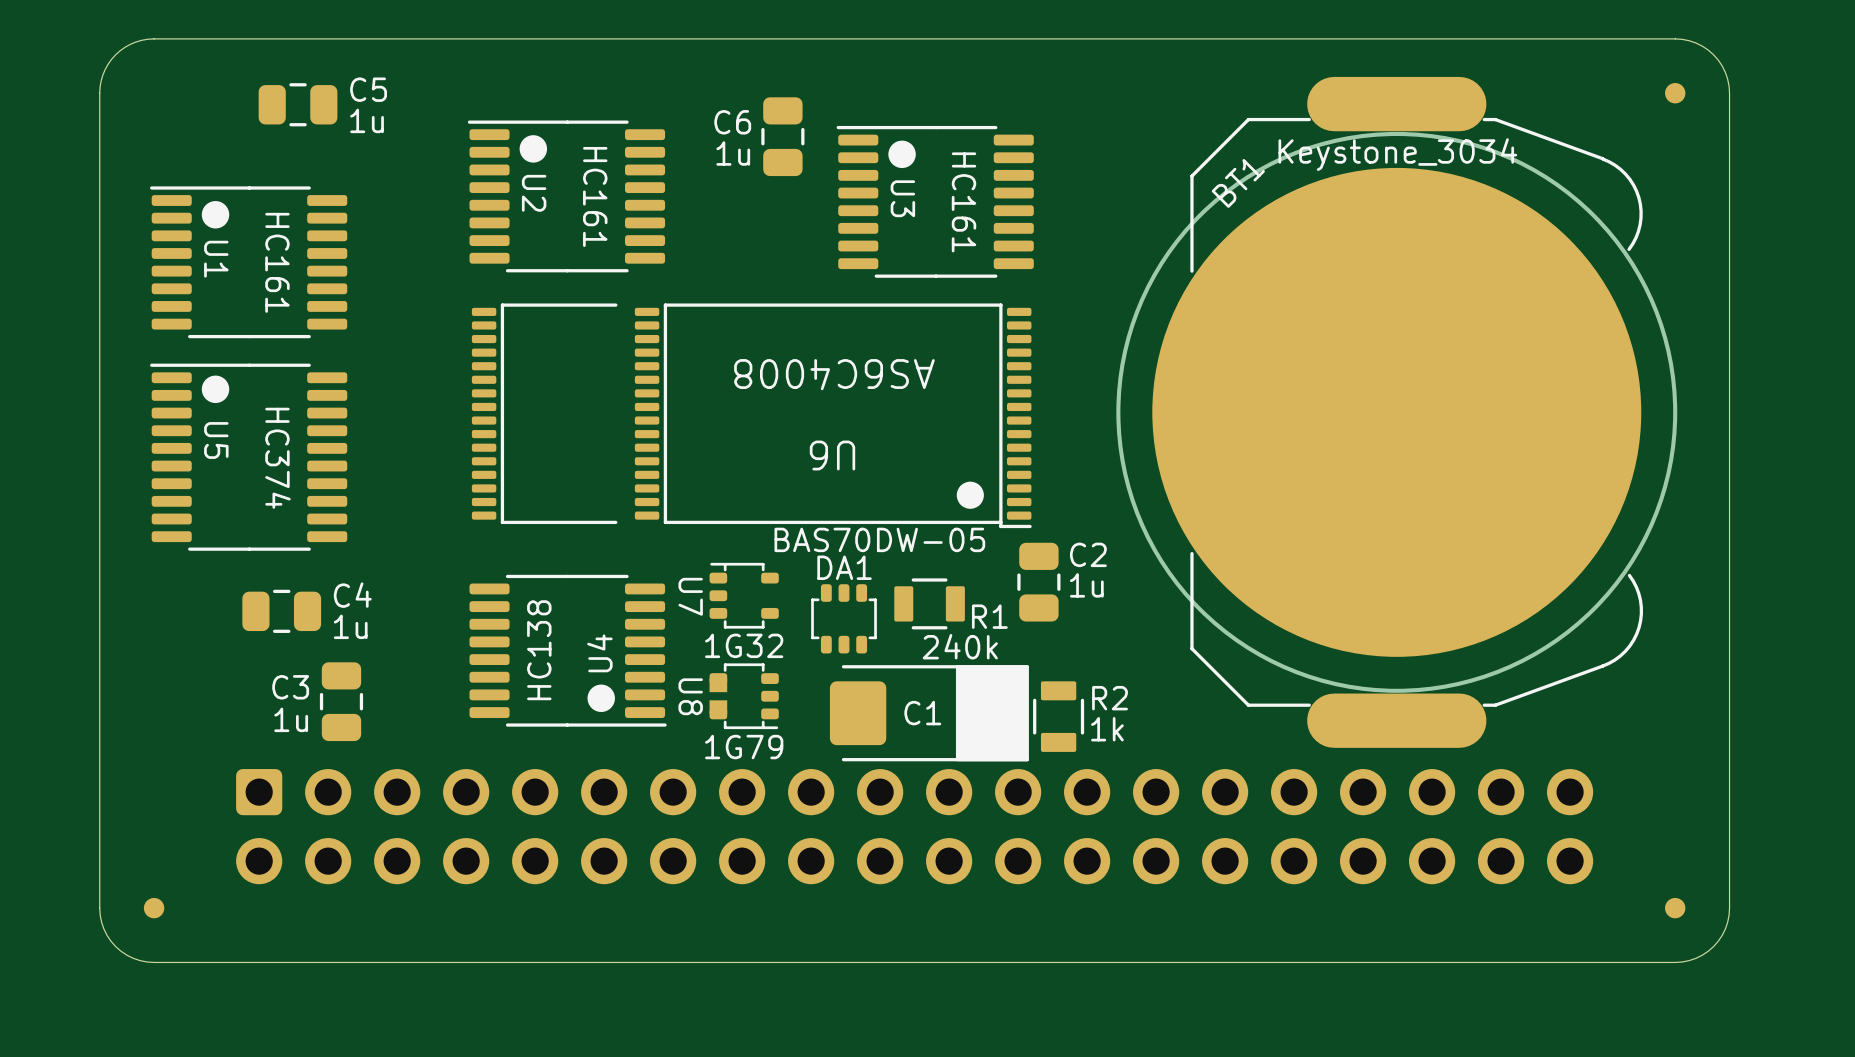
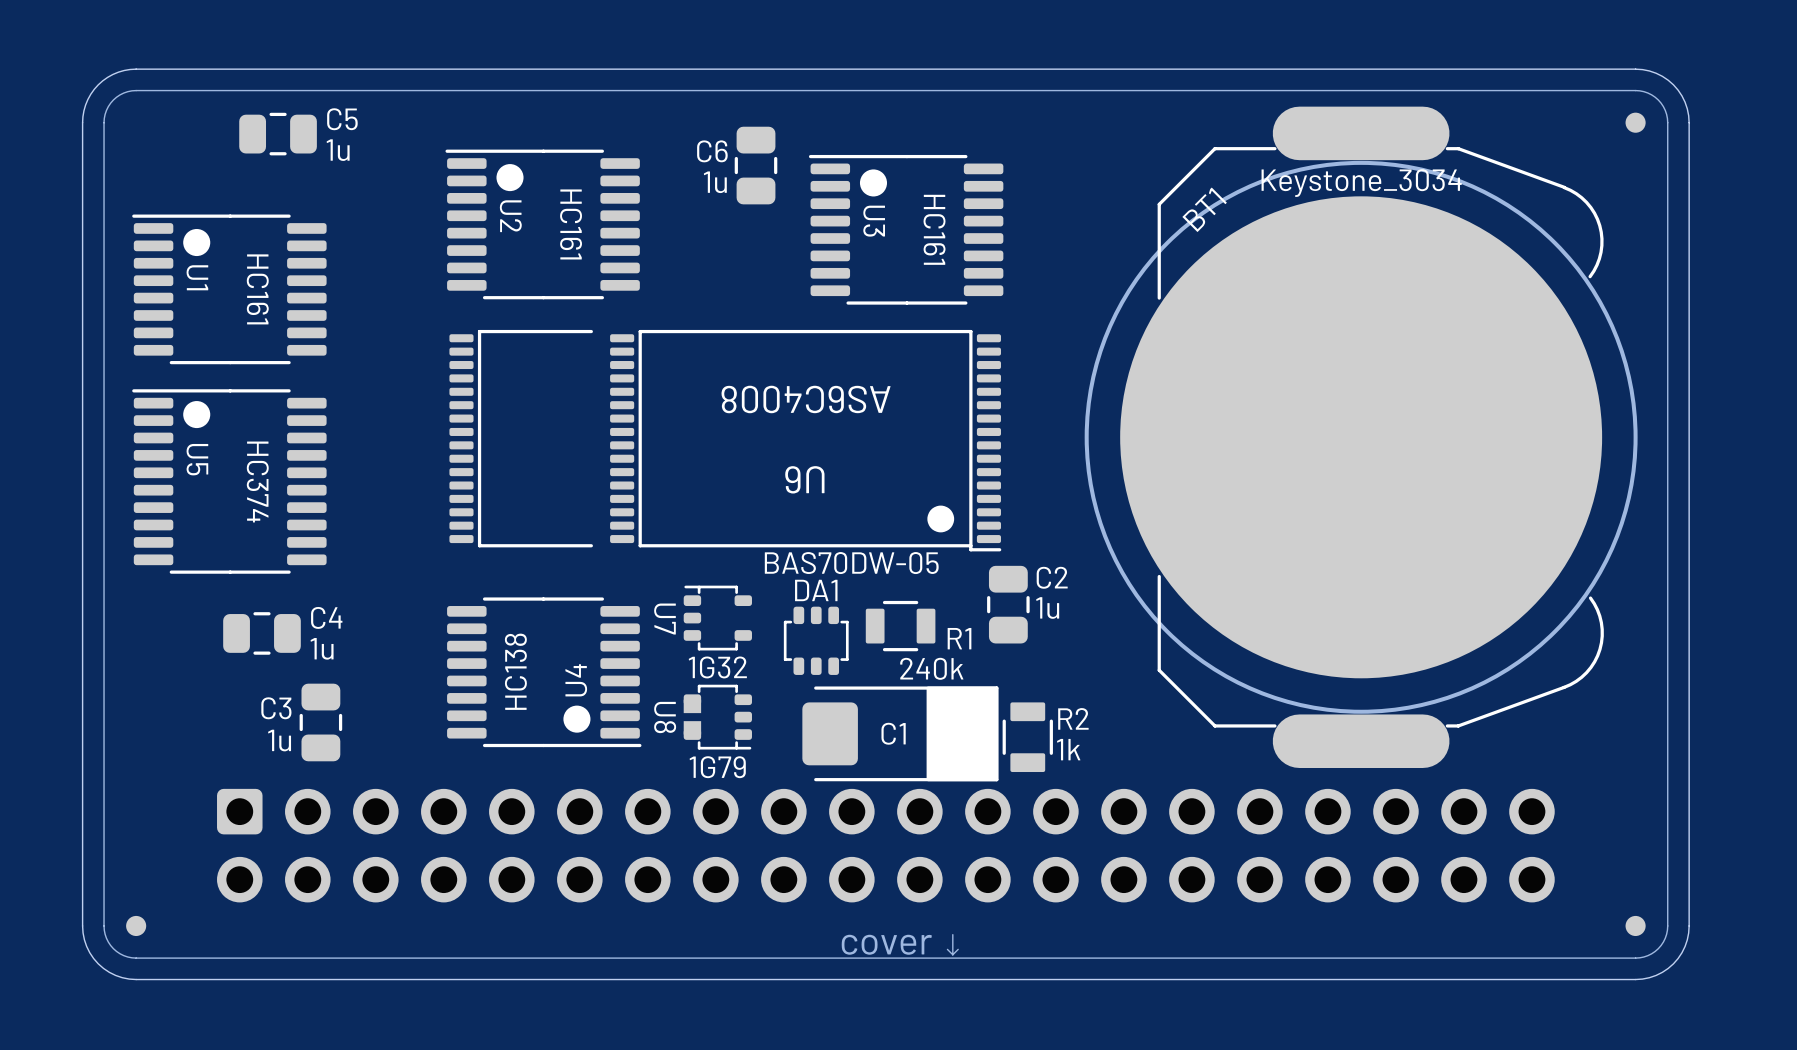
line: none -> (136, 90) (1635, 90) (1651, 94) (1663, 106) (1667, 122) (1667, 925) (1663, 942) (1651, 953) (1635, 958) (136, 958) (120, 953) (108, 942) (104, 925) (104, 122) (106, 110) (113, 99) (123, 93) (136, 90)
line: none -> (952, 934) (952, 954)
text: none -> cover (886, 944)
line: none -> (947, 949) (952, 954)
line: none -> (958, 949) (952, 954)

